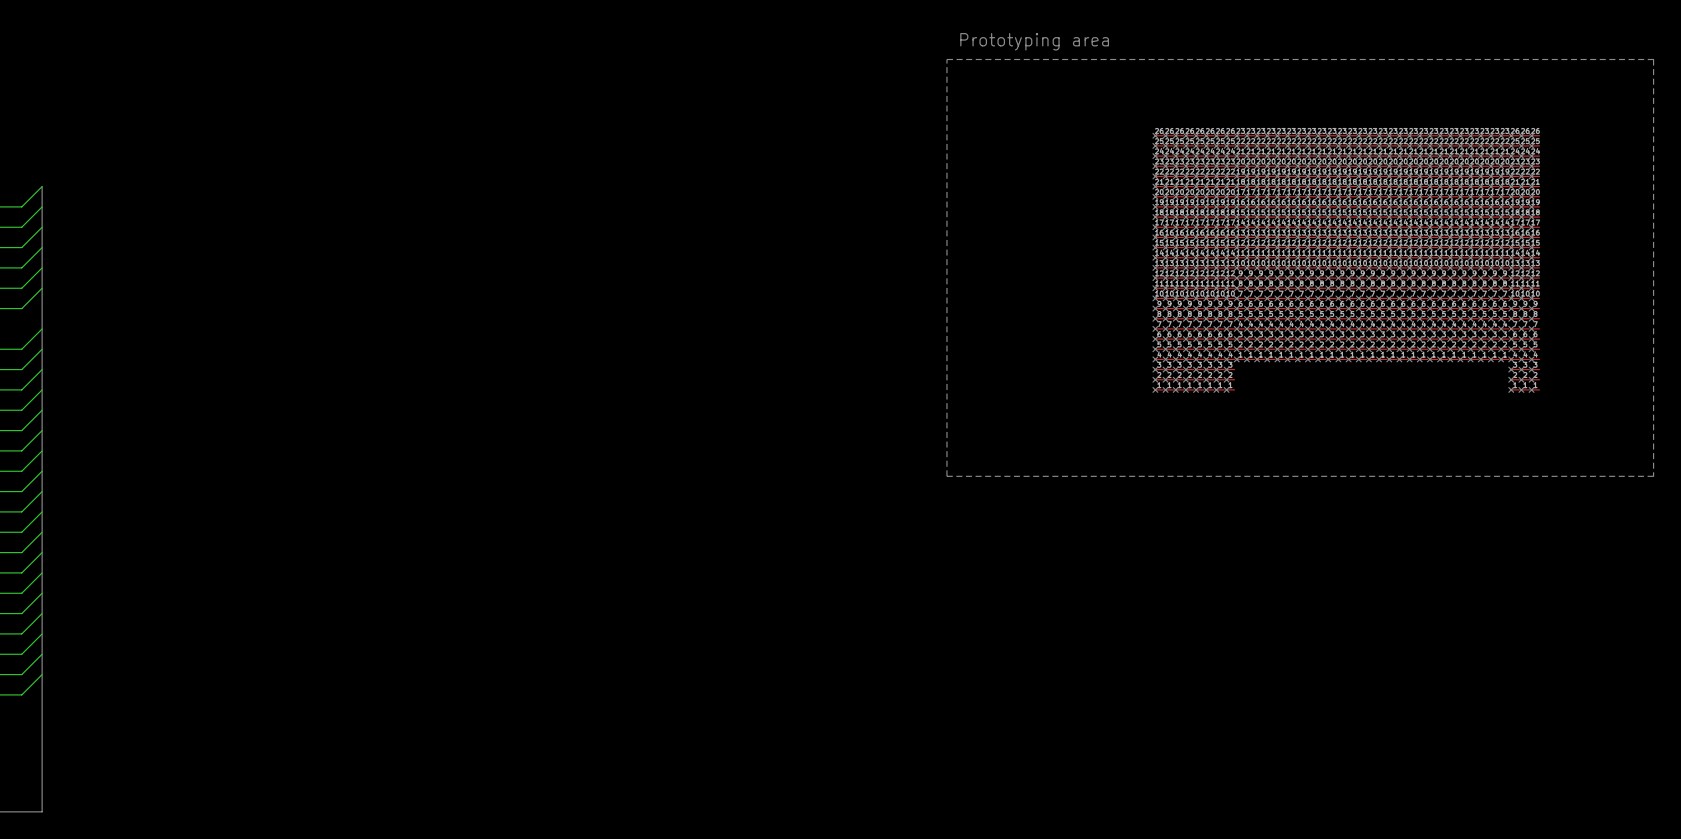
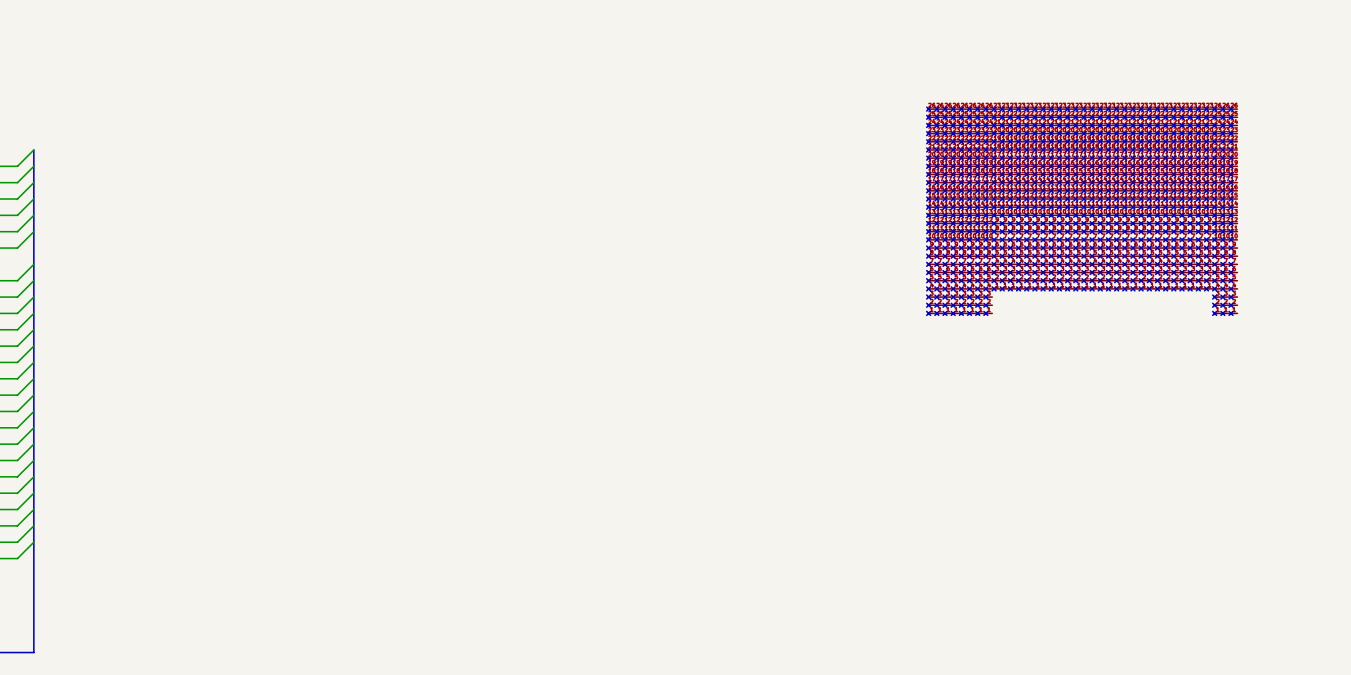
text: Prototyping area (1034, 41) -> none
line: (946, 59) (1653, 59) (1653, 476) (946, 476) (946, 59) -> none

